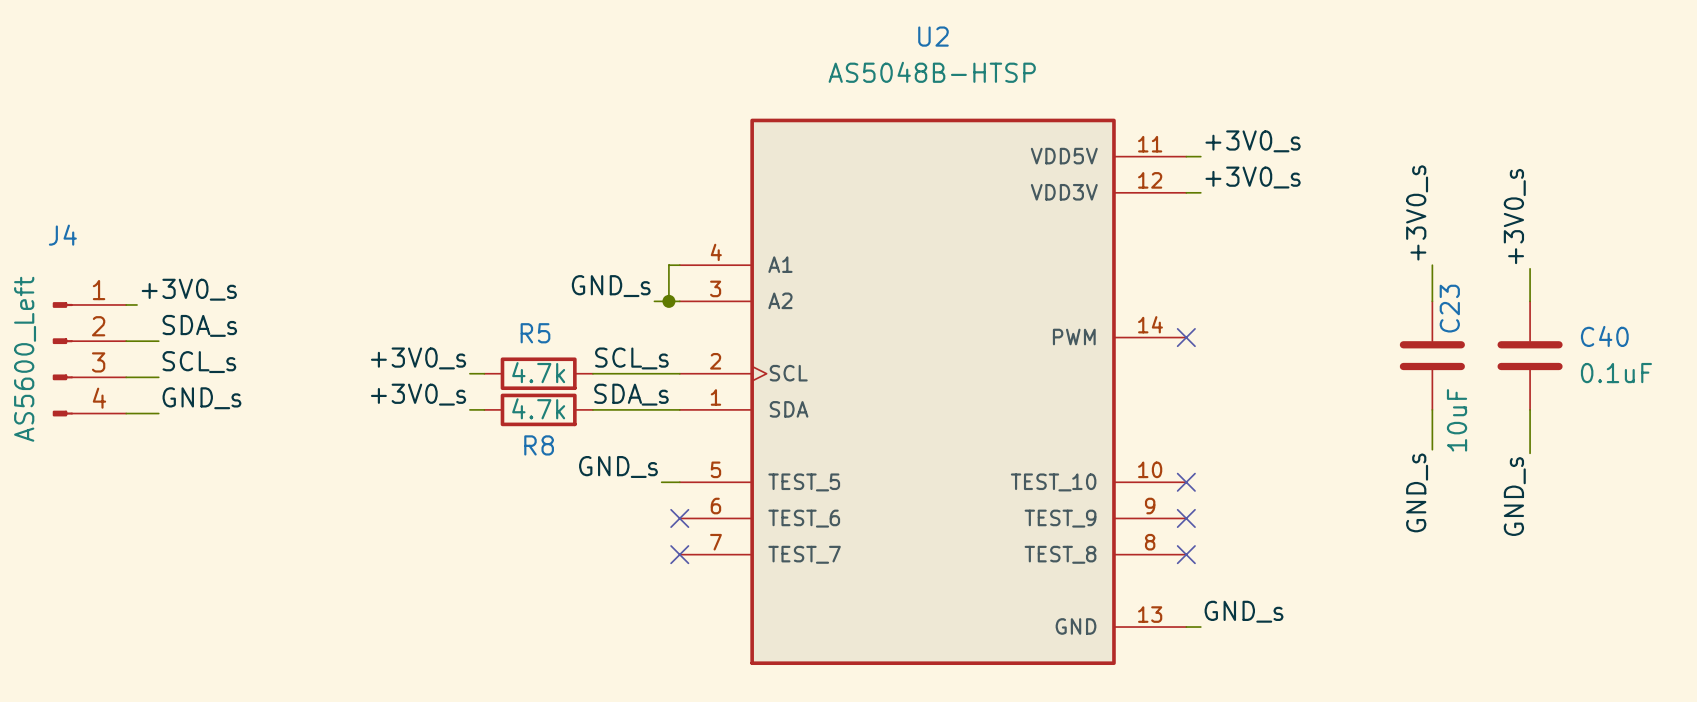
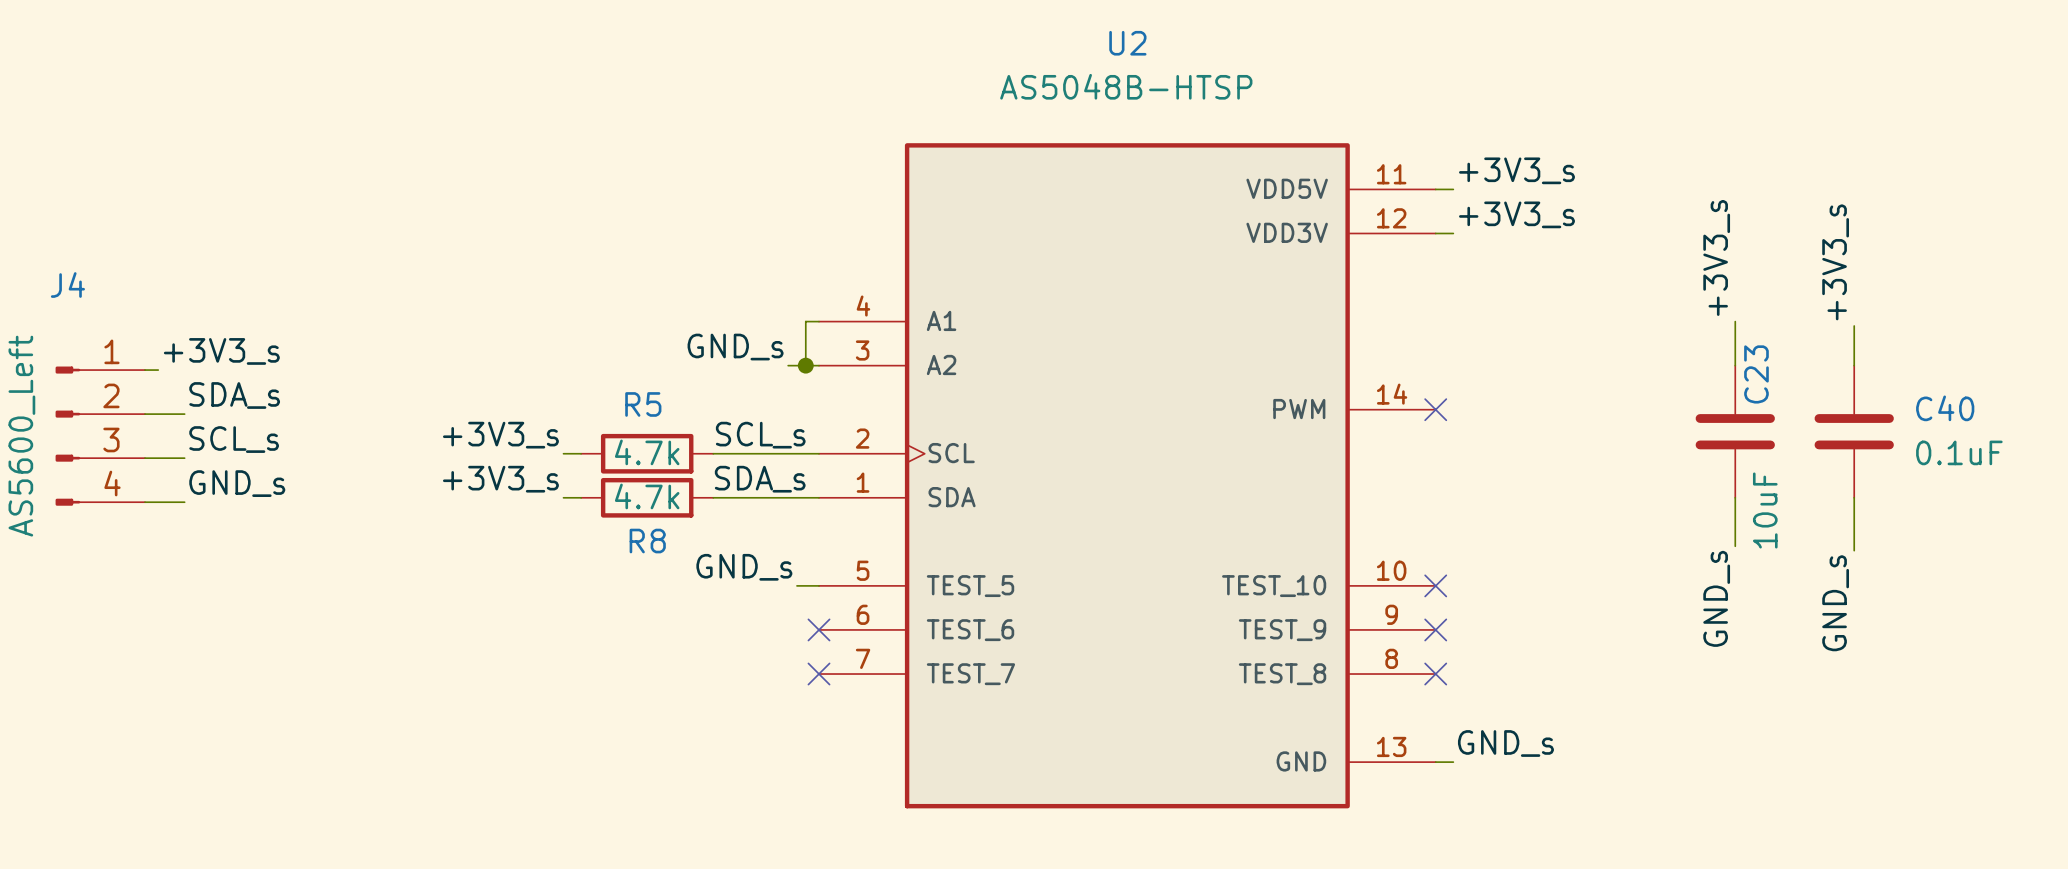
label: +3V0_s (1253, 141) -> +3V3_s (1516, 170)
label: +3V0_s (1253, 177) -> +3V3_s (1516, 214)
label: +3V0_s (1417, 212) -> +3V3_s (1716, 257)
label: +3V0_s (1514, 216) -> +3V3_s (1835, 262)
label: +3V0_s (189, 289) -> +3V3_s (221, 351)
label: +3V0_s (418, 358) -> +3V3_s (500, 435)
label: +3V0_s (418, 394) -> +3V3_s (500, 479)

